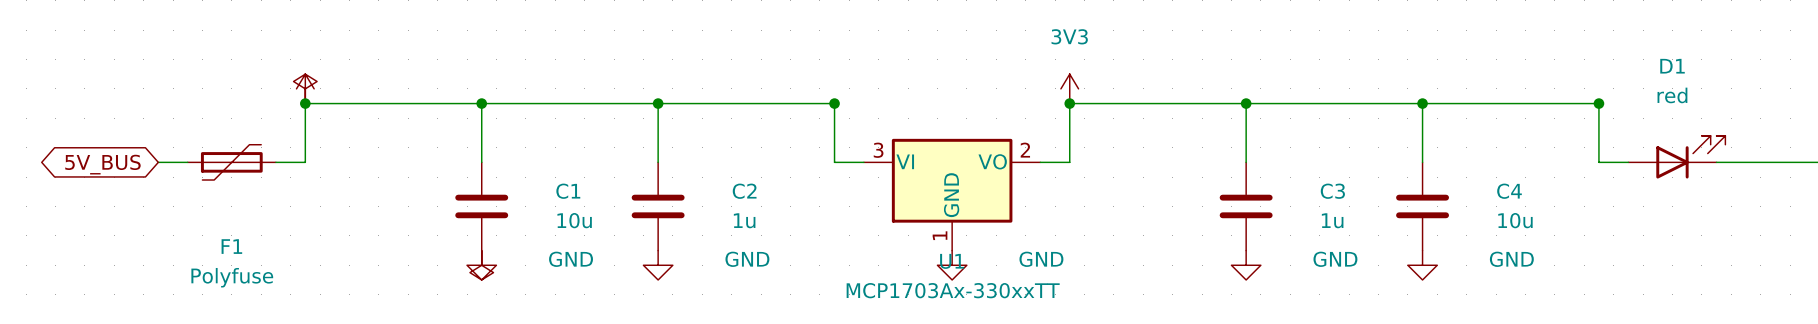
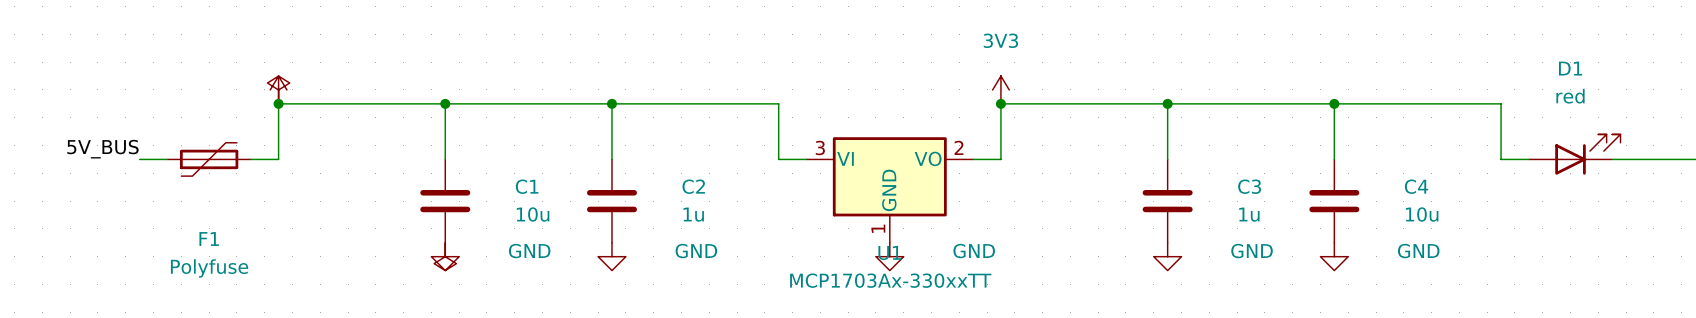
junction: (834, 103) -> none
junction: (1598, 103) -> none
label: none -> 5V_BUS (102, 149)
global label: 5V_BUS (102, 164) -> none

